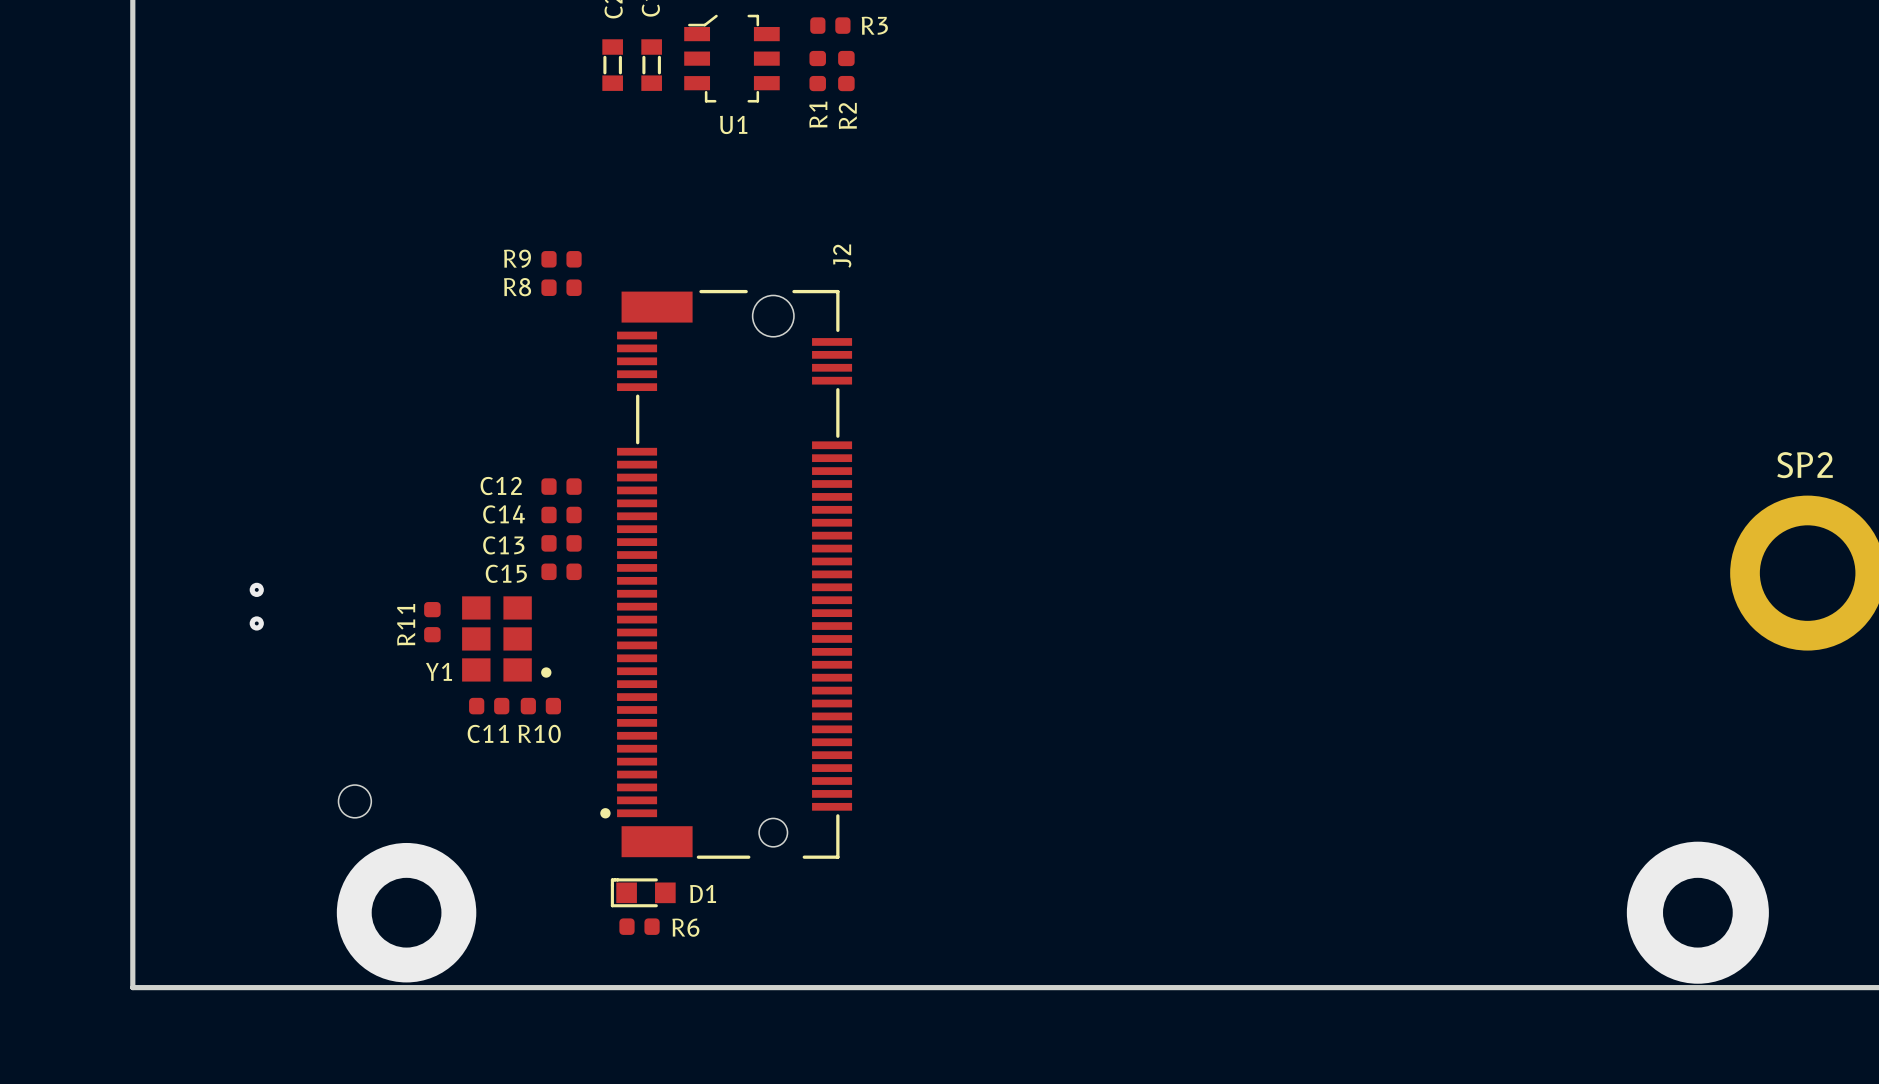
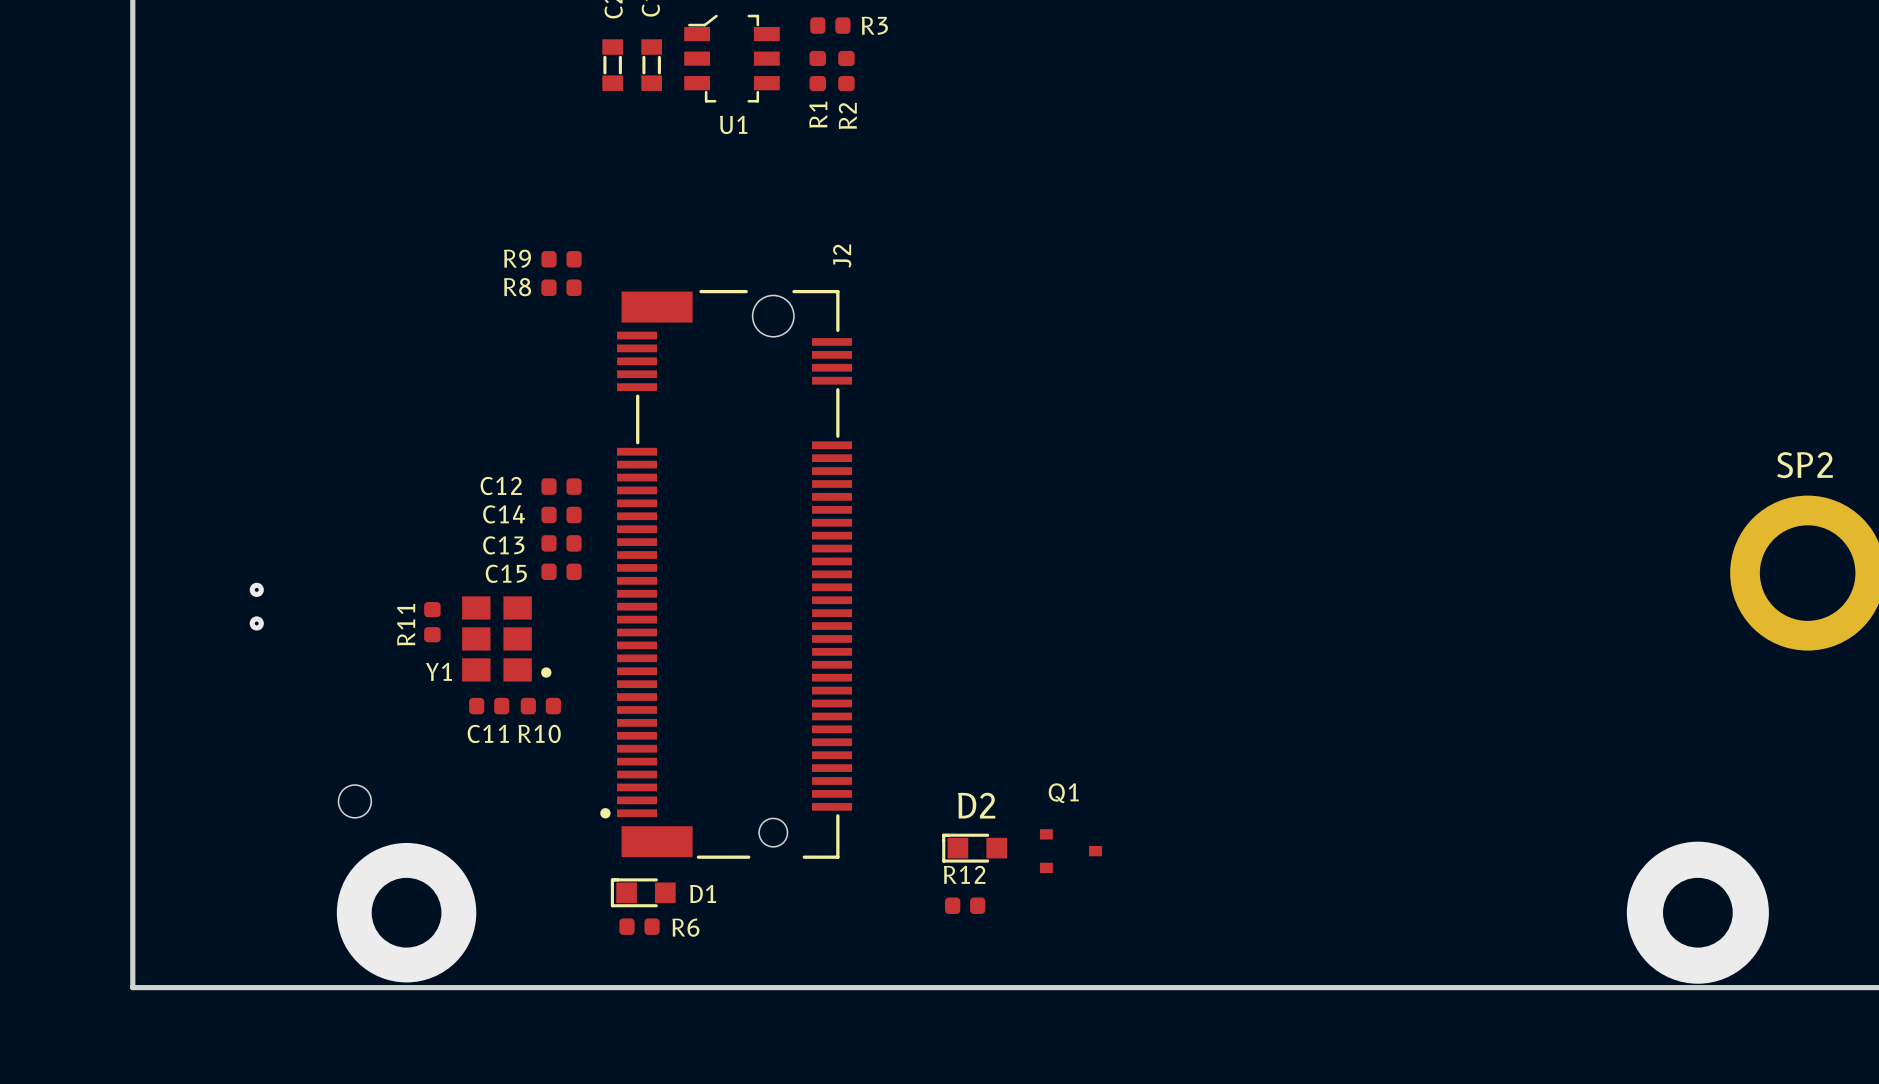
D2: none -> (974, 848)
Q1: none -> (1070, 851)
R12: none -> (965, 905)

